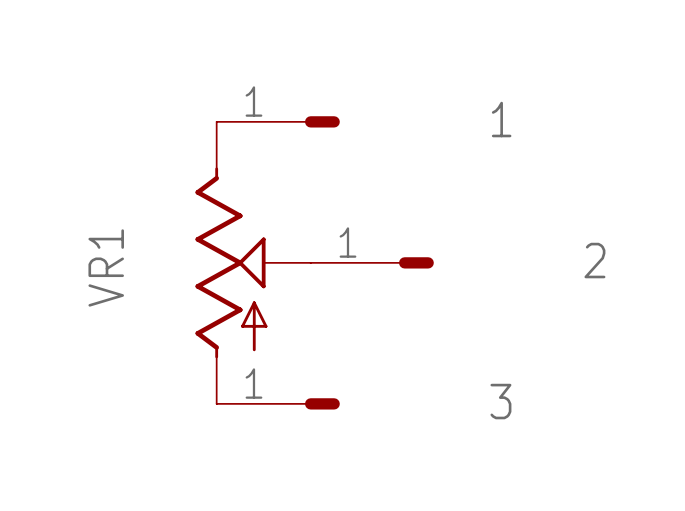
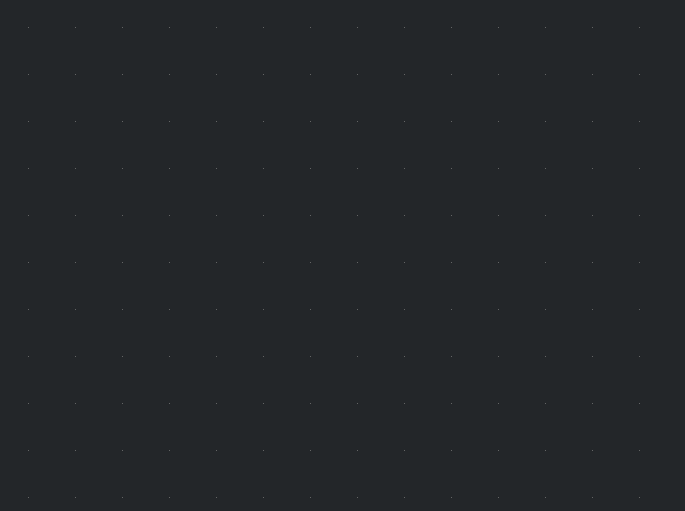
1: (278, 121) -> none
VR1: (253, 262) -> none
2: (372, 262) -> none
3: (278, 403) -> none

